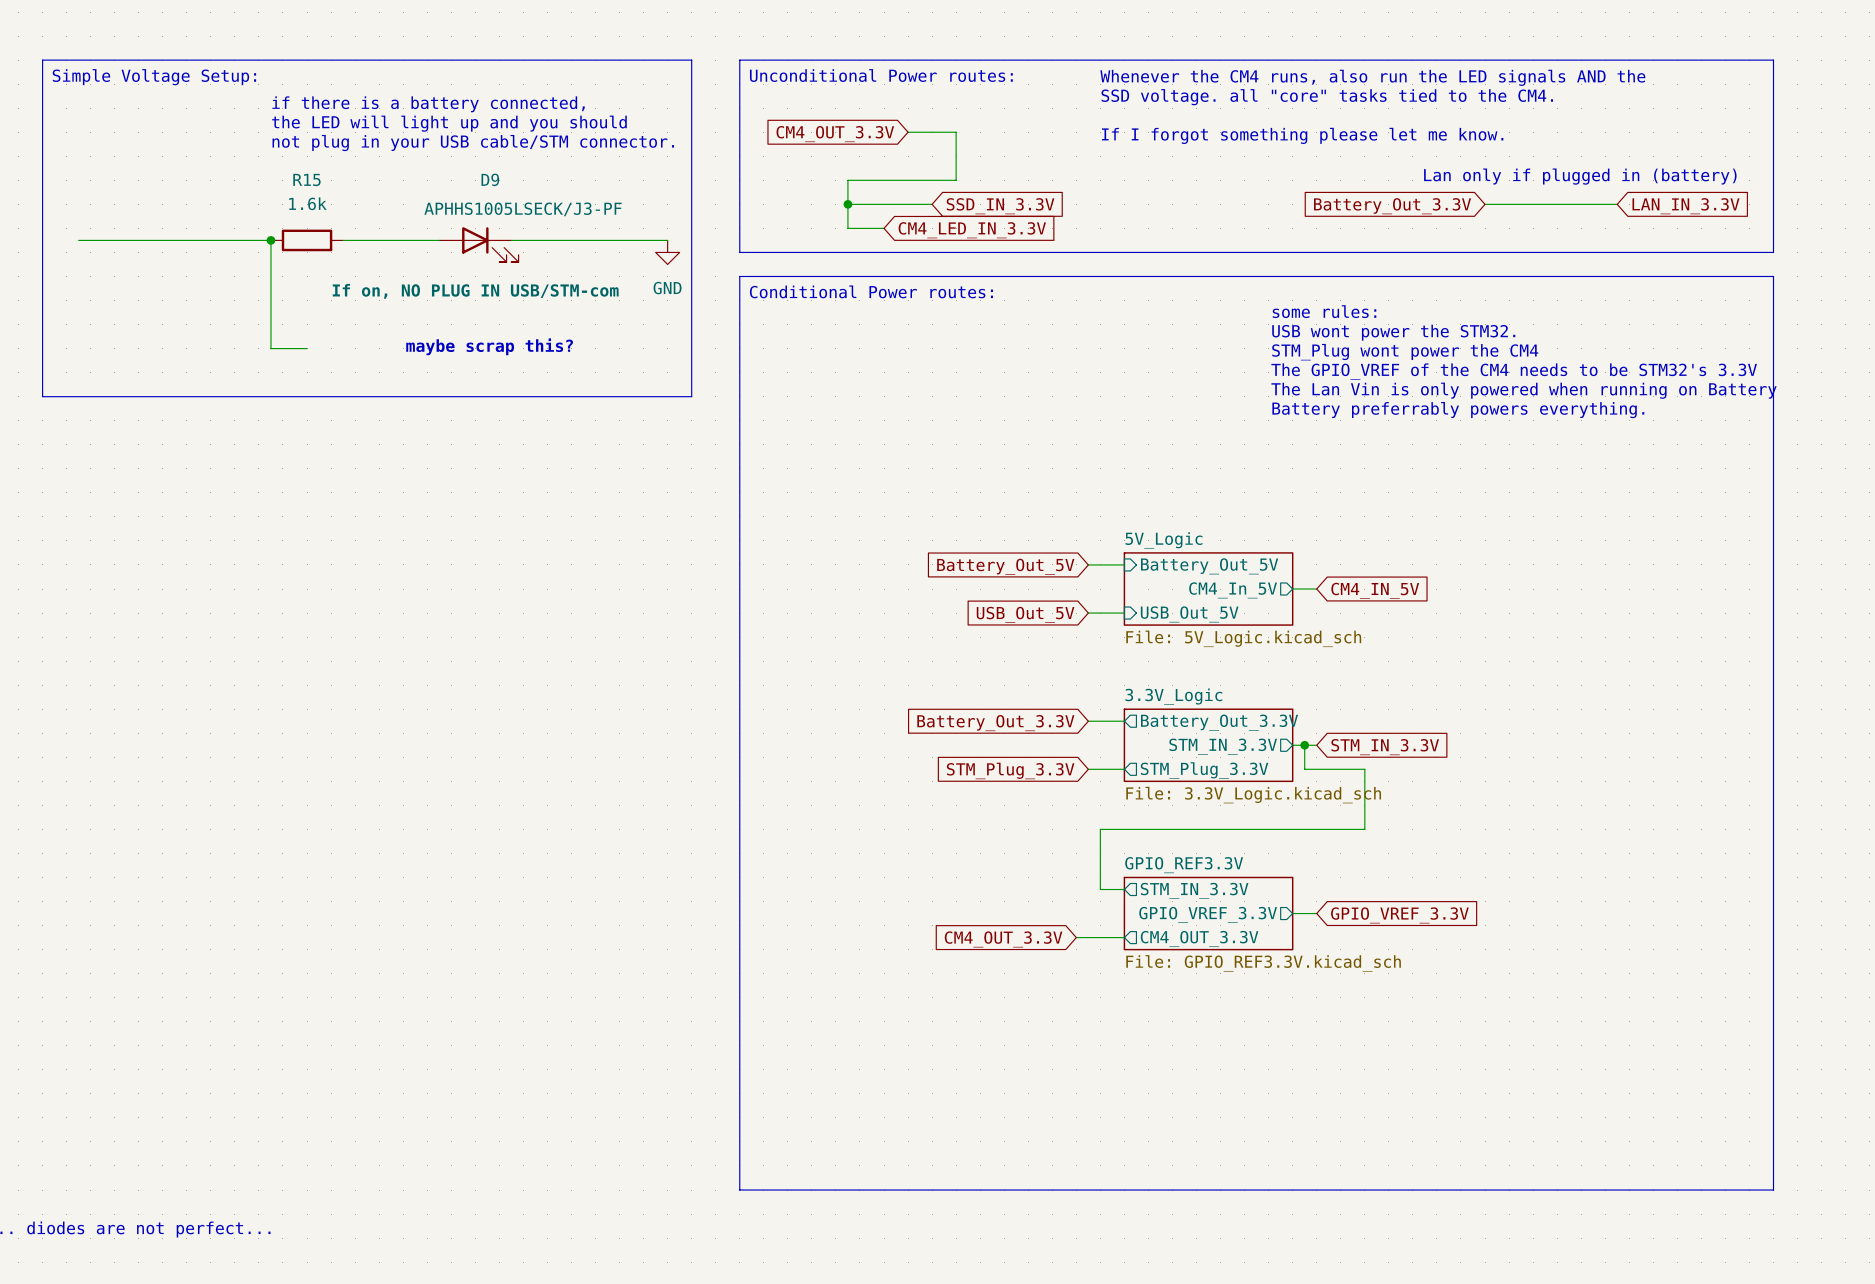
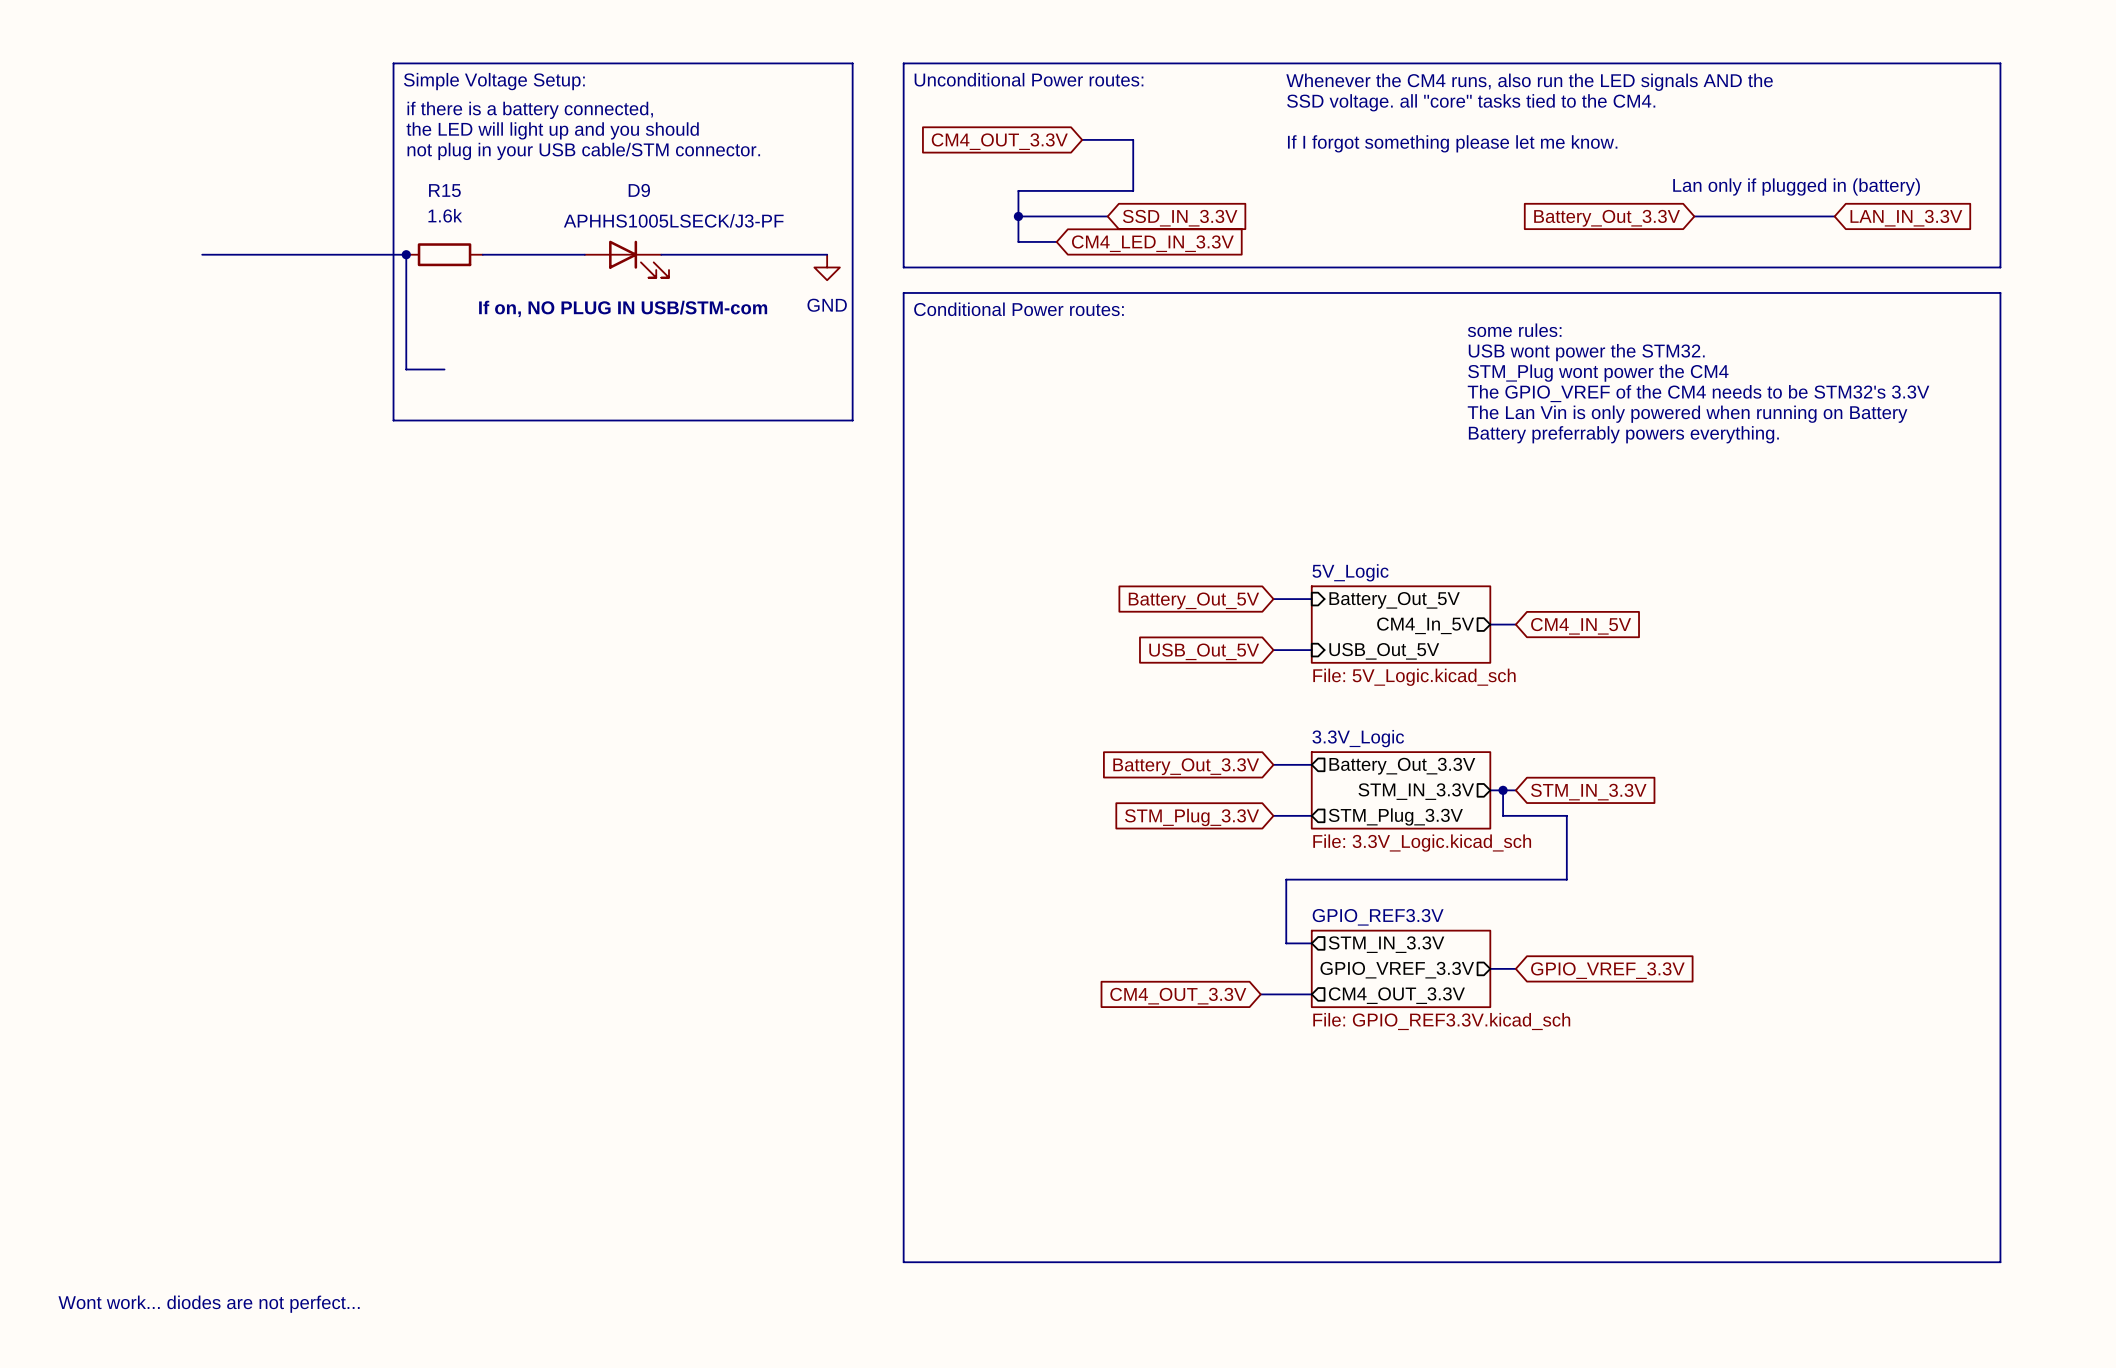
line: (258, 60) (42, 60) (42, 396) (258, 396) -> (393, 63) (393, 420)
text position: Simple Voltage Setup: (154, 77) -> Simple Voltage Setup: (494, 81)
text: maybe scrap this? (489, 346) -> none

